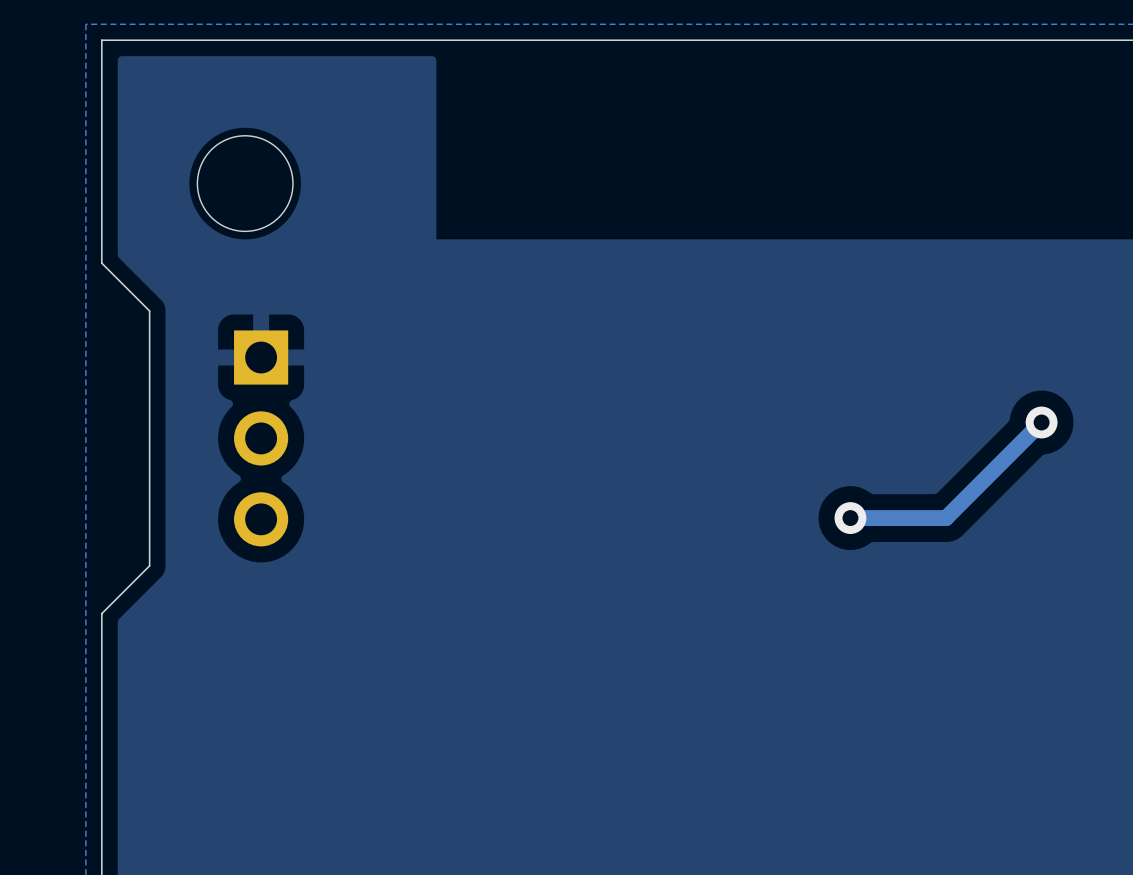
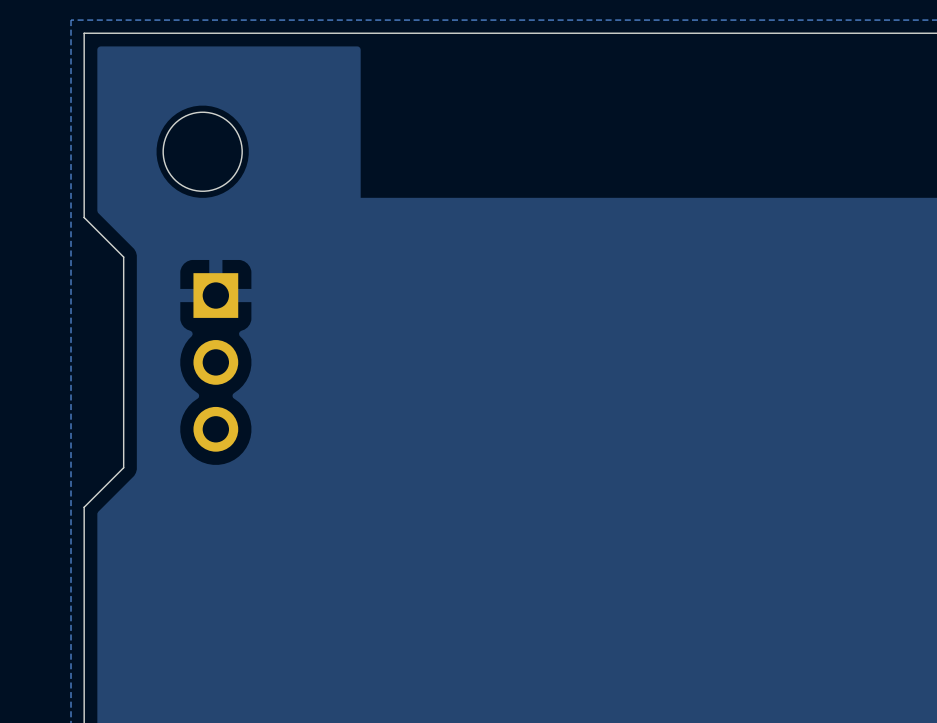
track: (1041, 422) (946, 518) (850, 518) -> none
via: (1041, 422) -> none
via: (850, 518) -> none

